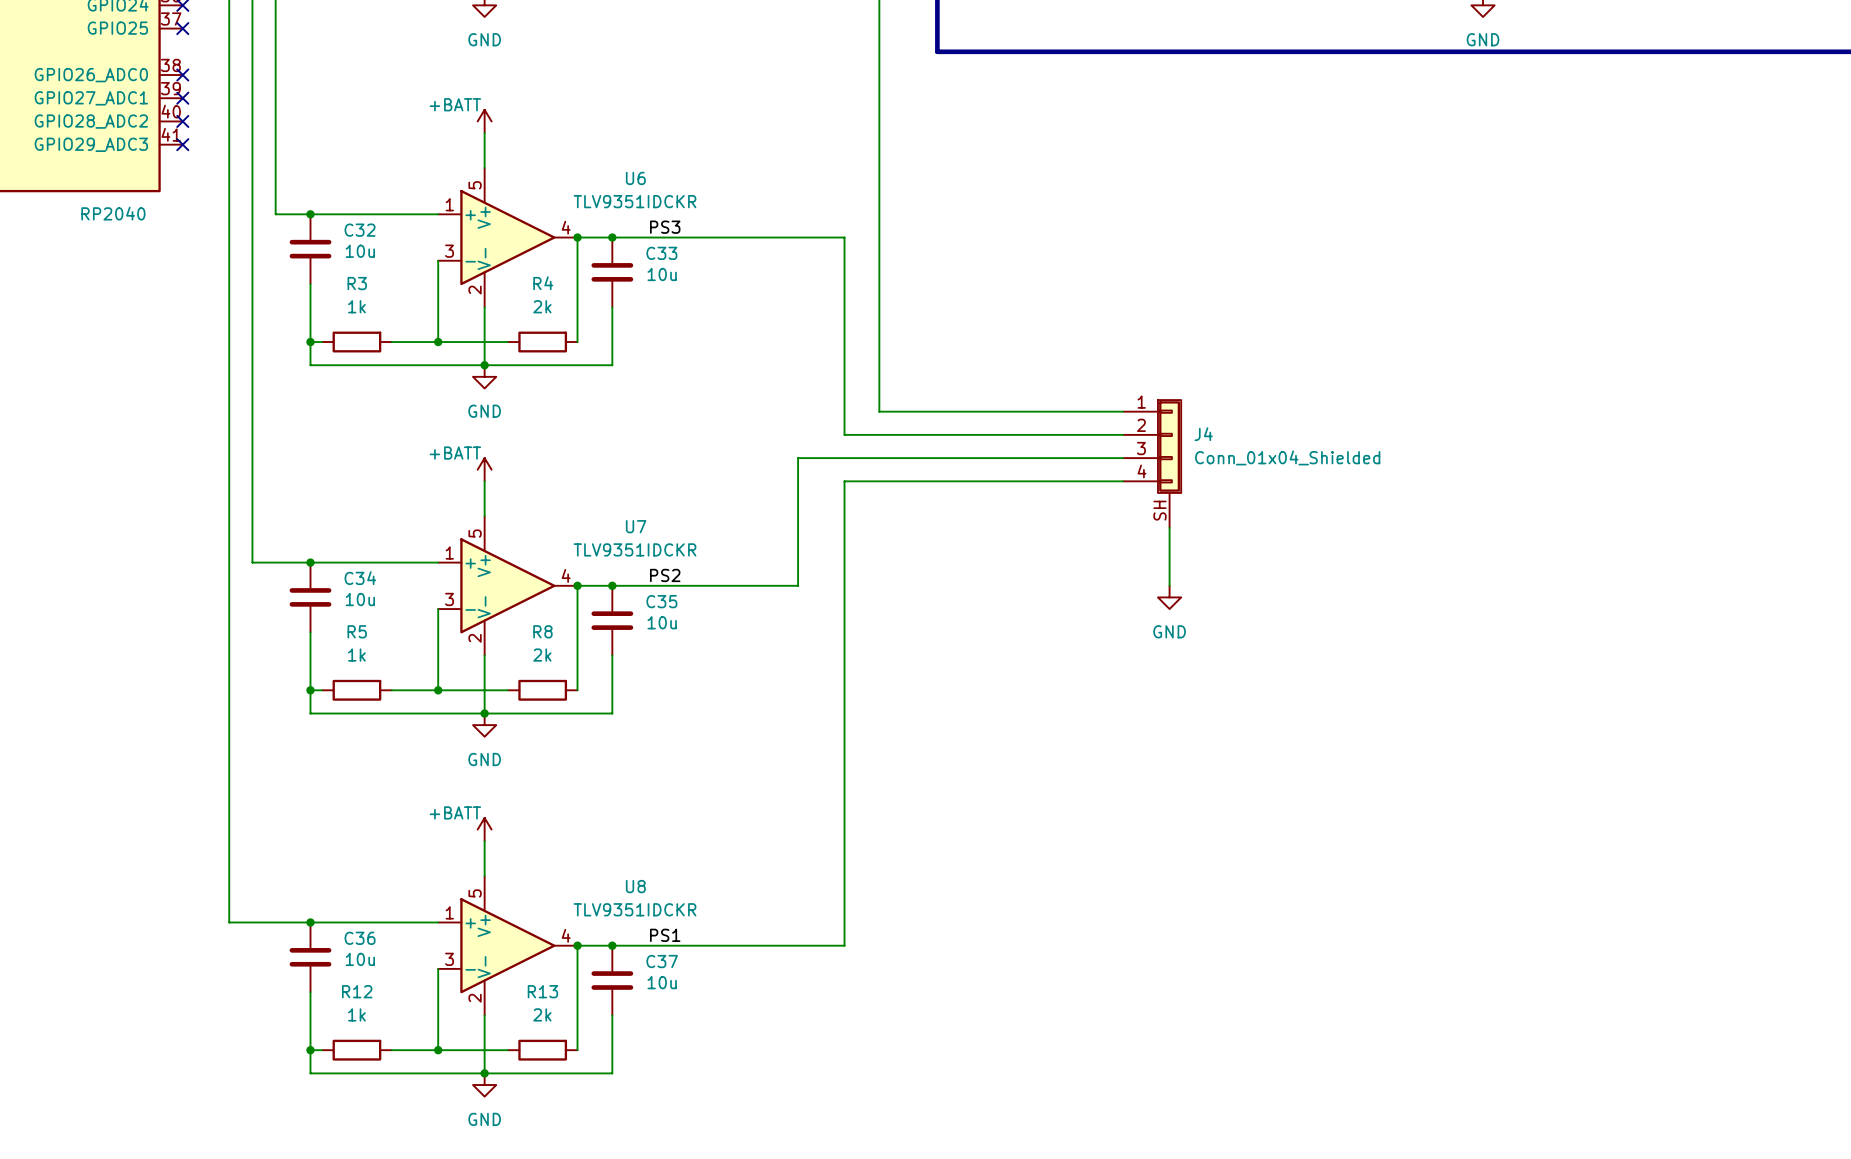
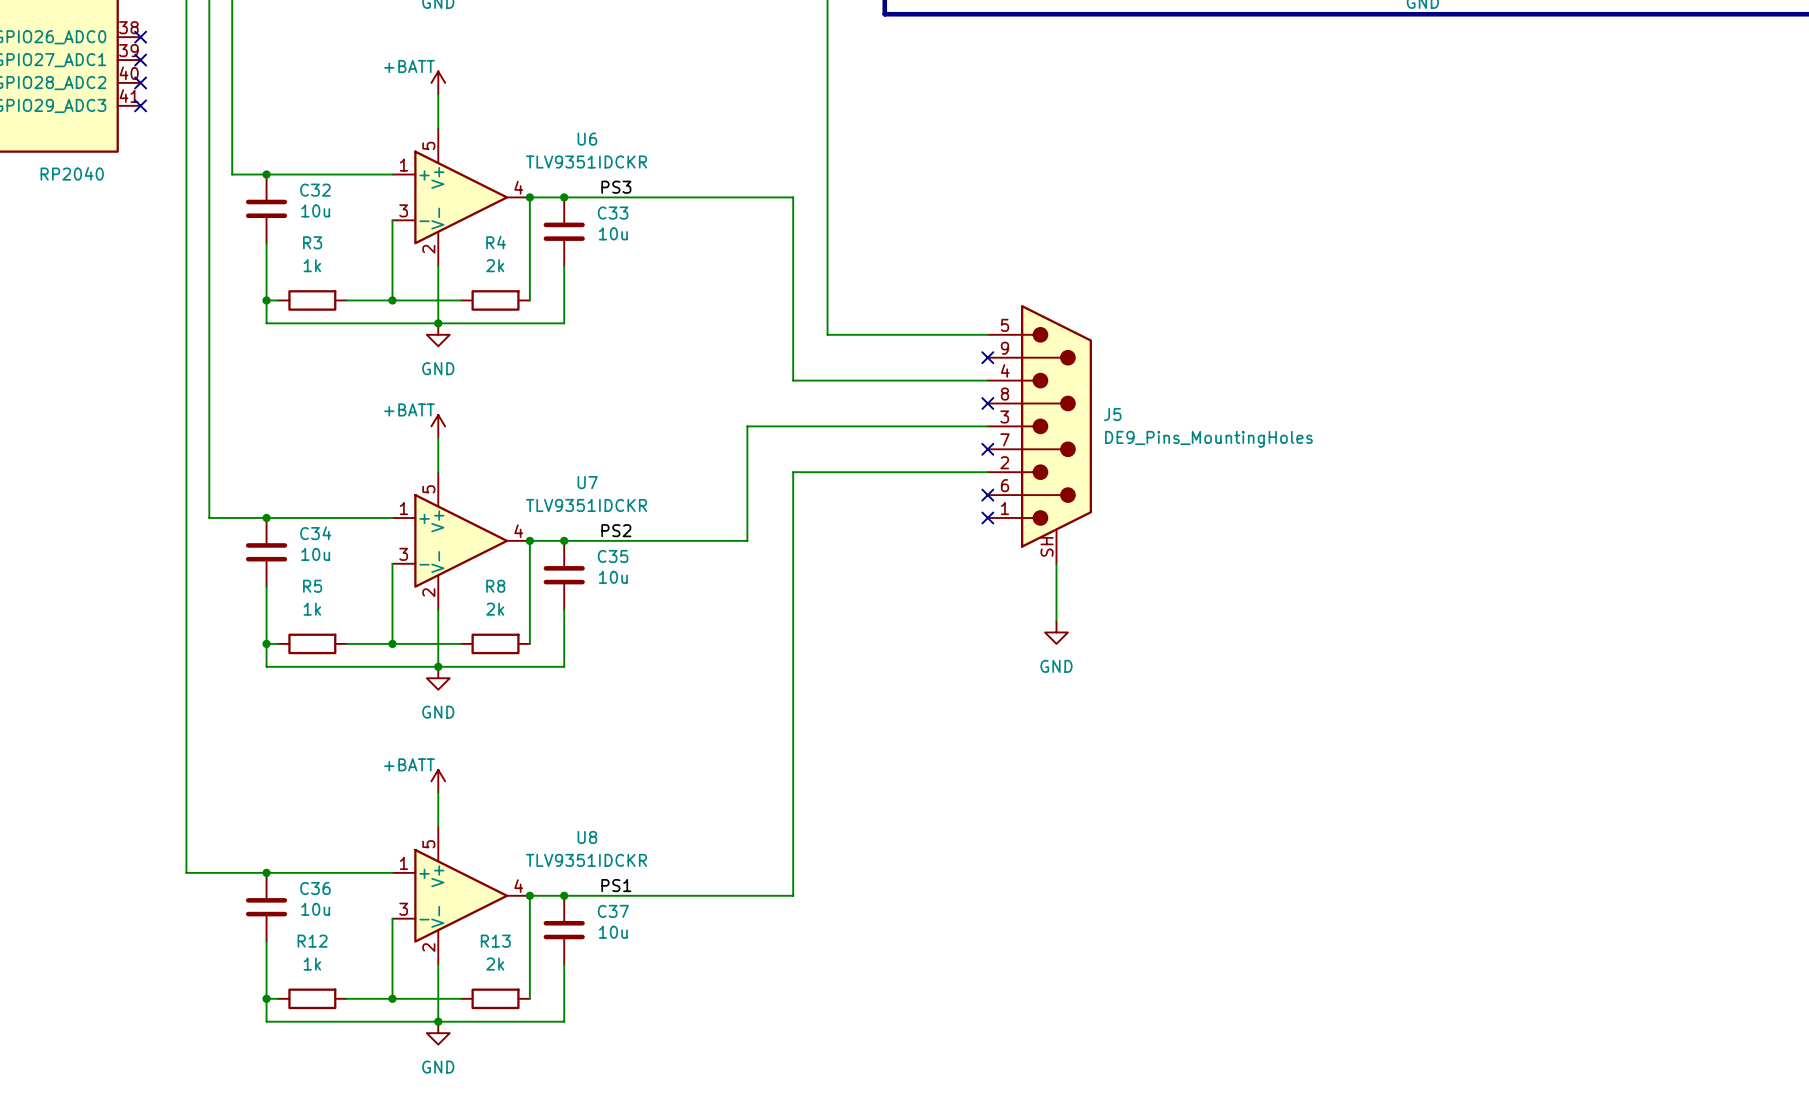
wire: (879, 376) (879, 411) (1123, 411) -> (827, 334) (987, 334)
no-connect mark: none -> (987, 357)
wire: (844, 423) (844, 434) (1123, 434) -> (793, 380) (987, 380)
no-connect mark: none -> (987, 403)
wire: (1123, 458) (798, 458) (798, 469) -> (987, 426) (747, 426)
J4: Conn_01x04_Shielded (1152, 463) -> none
J5: none -> DE9_Pins_MountingHoles (1039, 434)
wire: (1123, 481) (844, 481) (844, 516) -> (987, 472) (793, 472)
no-connect mark: none -> (987, 449)
wire: (1169, 527) (1169, 585) -> (1056, 563) (1056, 621)
no-connect mark: none -> (987, 495)
no-connect mark: none -> (987, 517)
power symbol position: GND (1169, 597) -> GND (1056, 632)

